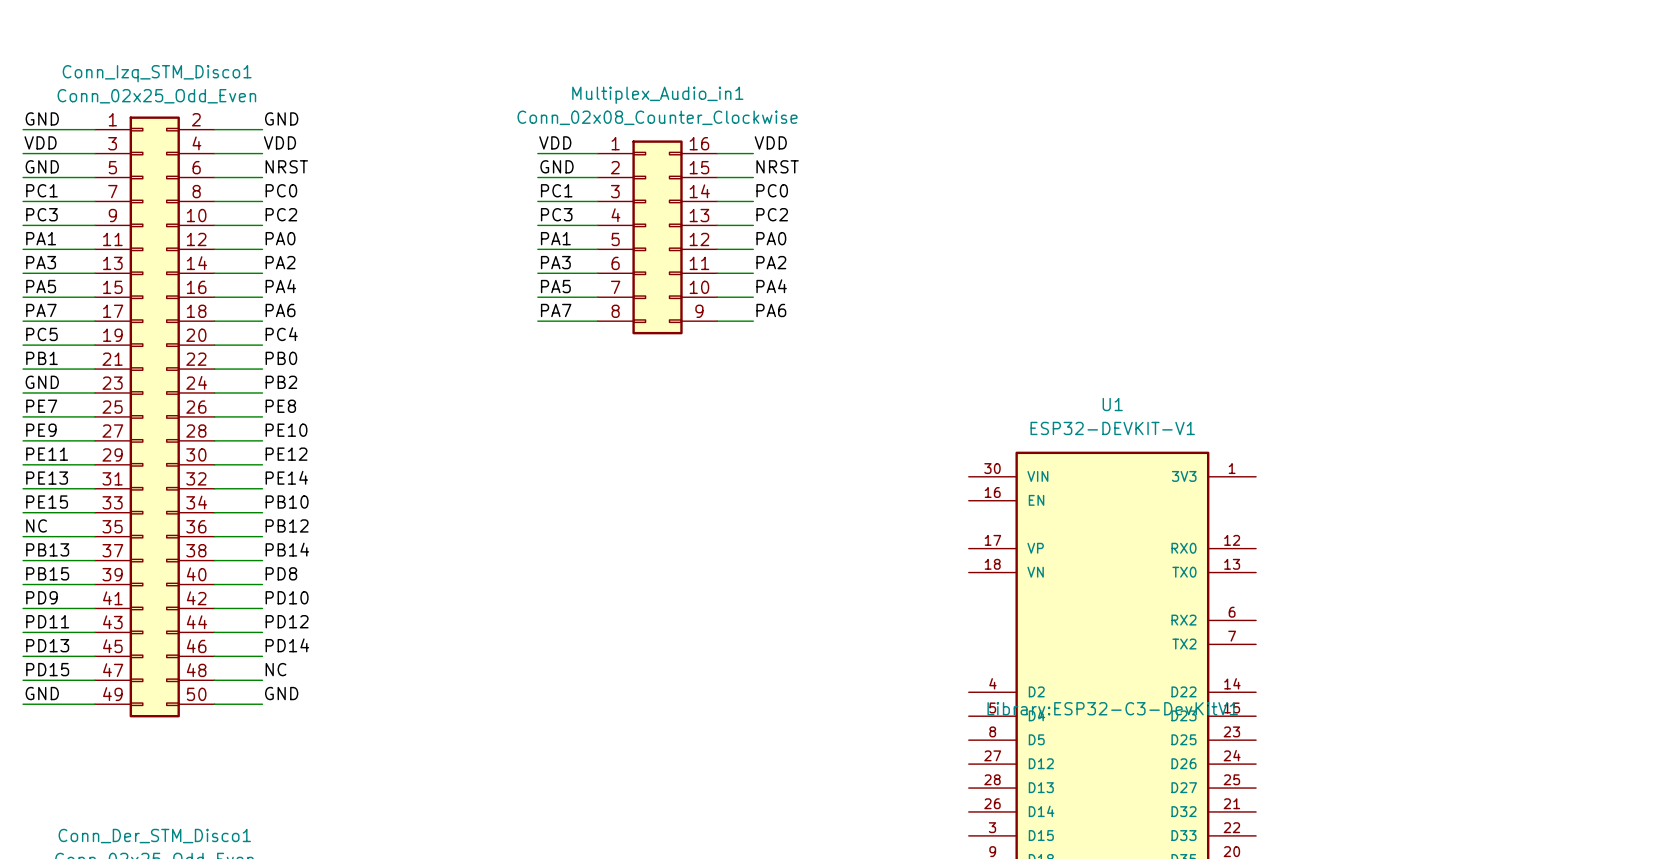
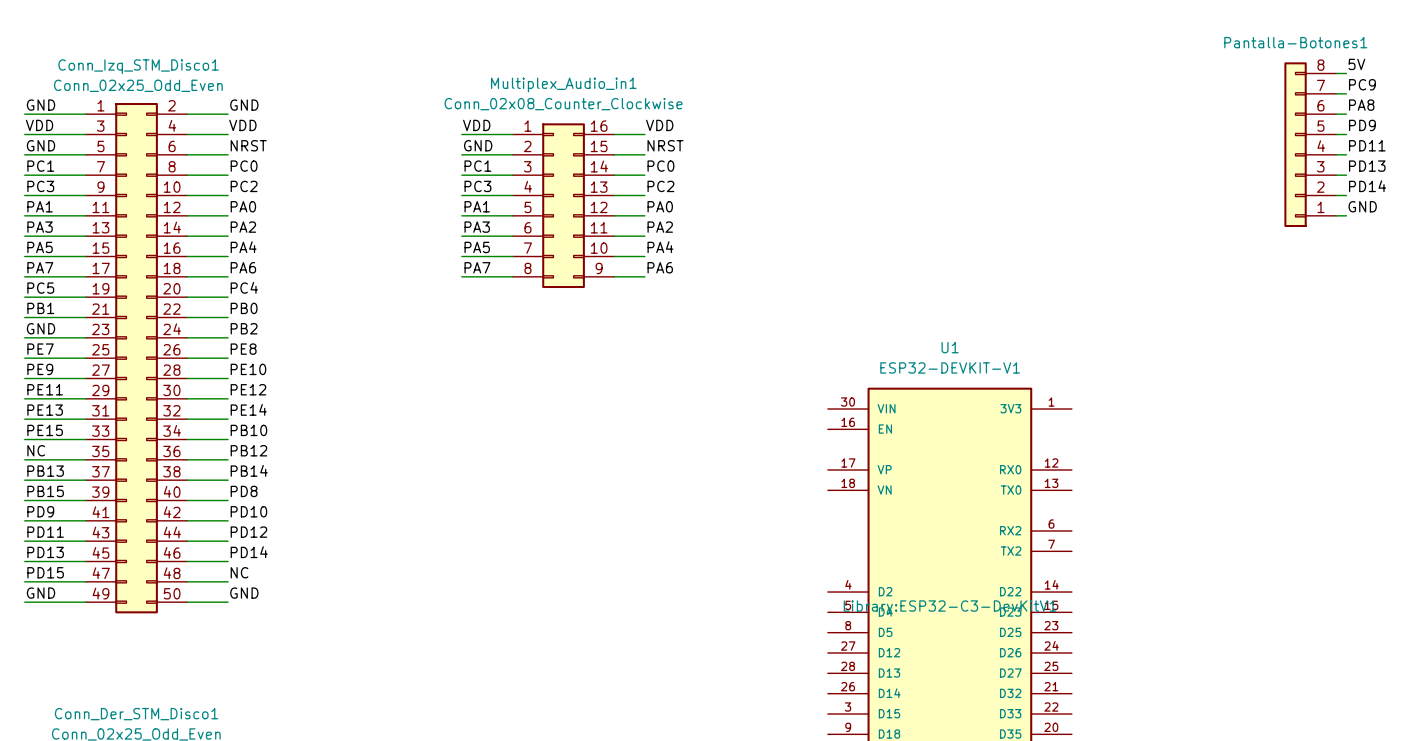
label: none -> 5V (1356, 64)
wire: none -> (1336, 73) (1346, 73)
label: none -> PC9 (1362, 84)
wire: none -> (1336, 93) (1346, 93)
label: none -> PA8 (1361, 105)
wire: none -> (1336, 114) (1346, 114)
label: none -> PD9 (1362, 125)
wire: none -> (1336, 134) (1346, 134)
Pantalla-Botones1: none -> (1310, 144)
label: none -> PD11 (1367, 145)
wire: none -> (1336, 154) (1346, 154)
label: none -> PD13 (1367, 166)
wire: none -> (1336, 175) (1346, 175)
label: none -> PD14 (1367, 186)
wire: none -> (1336, 195) (1346, 195)
label: none -> GND (1362, 206)
wire: none -> (1336, 215) (1346, 215)

